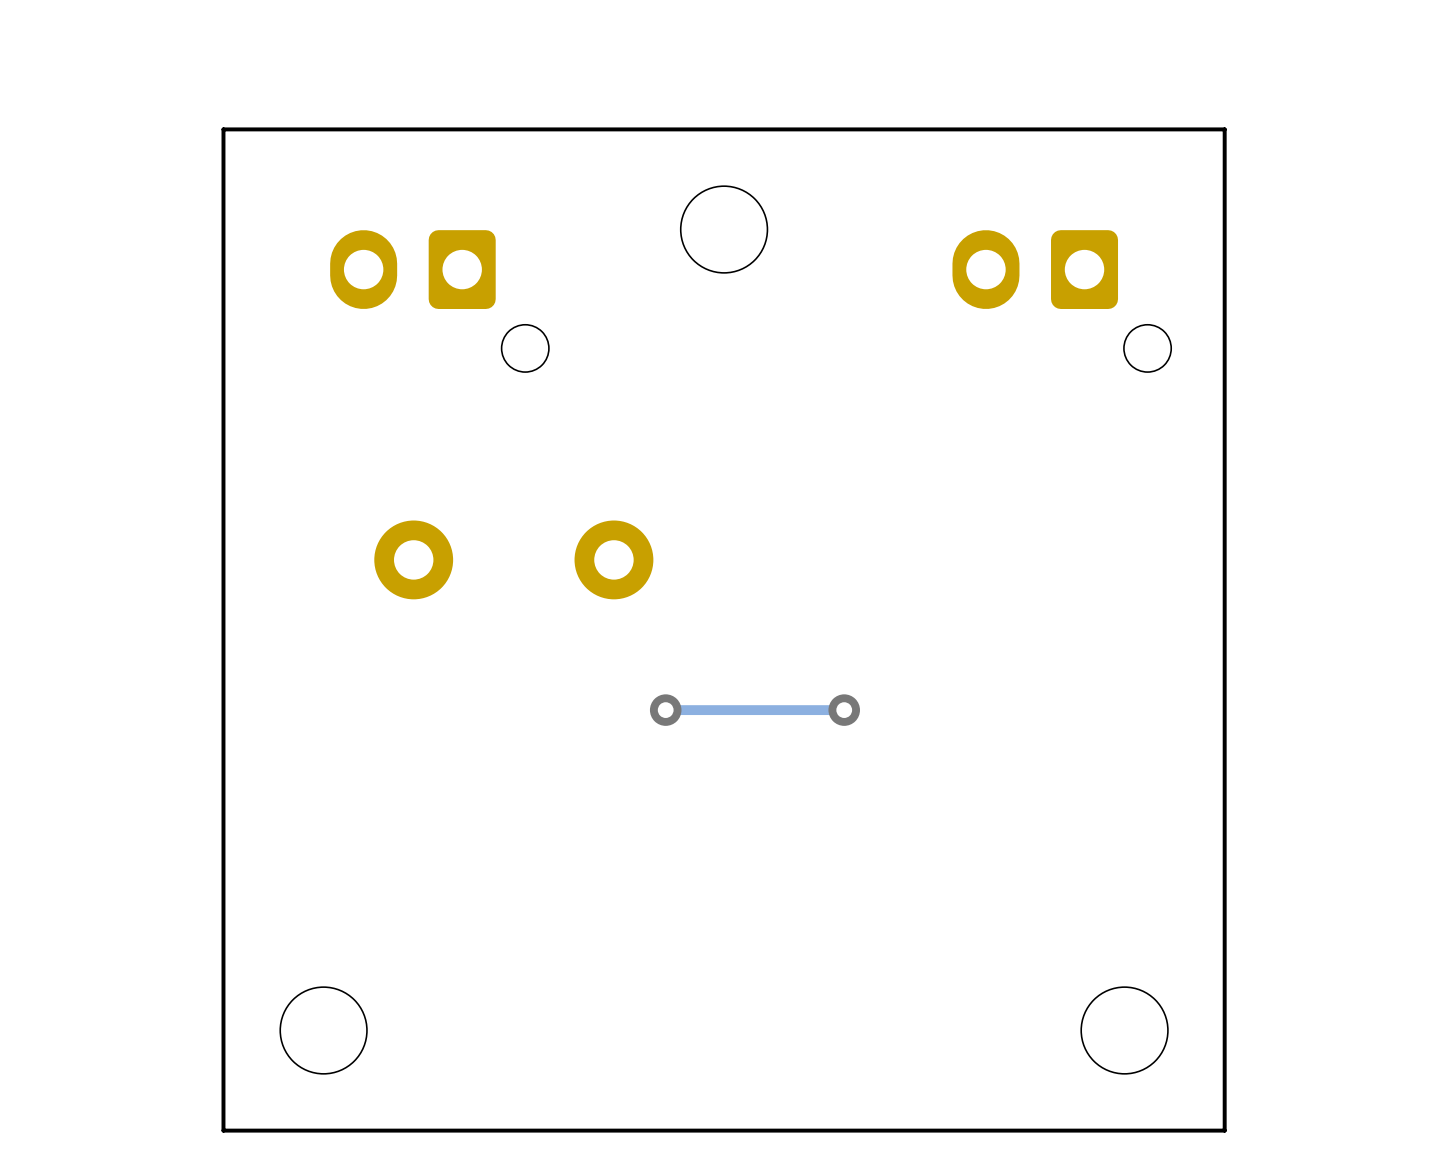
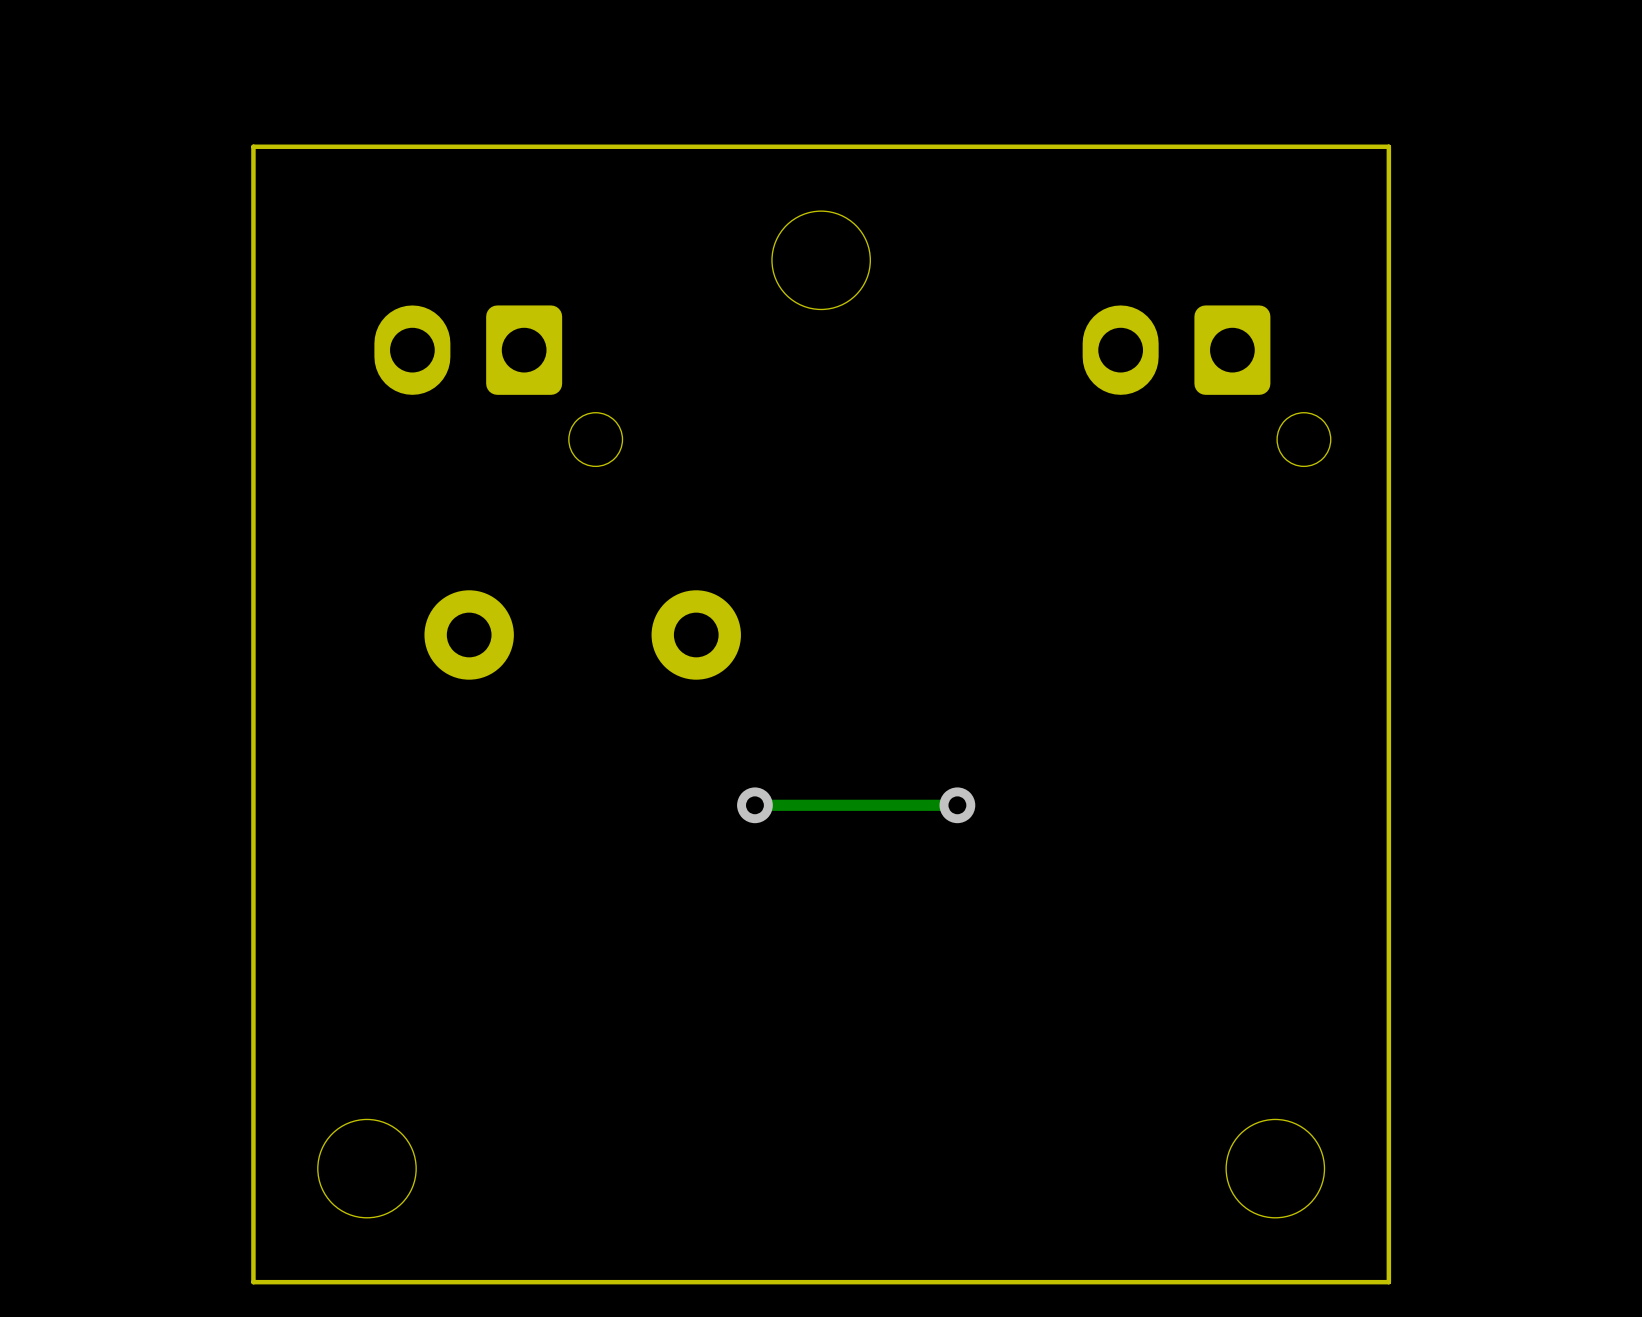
part position: (439, 301) -> (498, 385)
part position: (1061, 301) -> (1206, 385)

